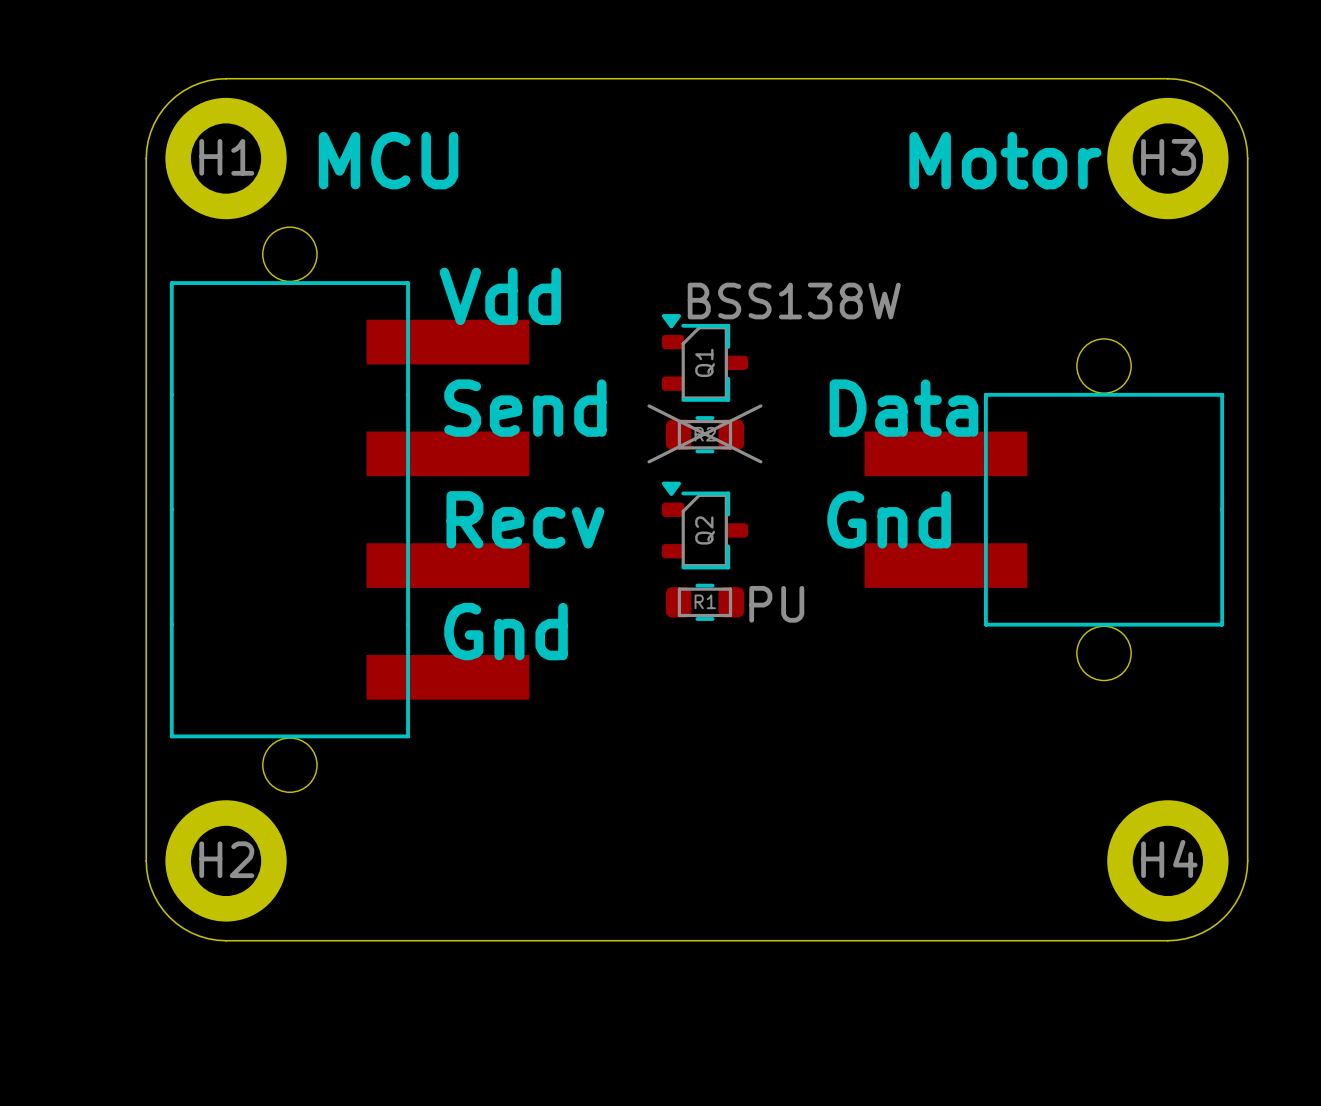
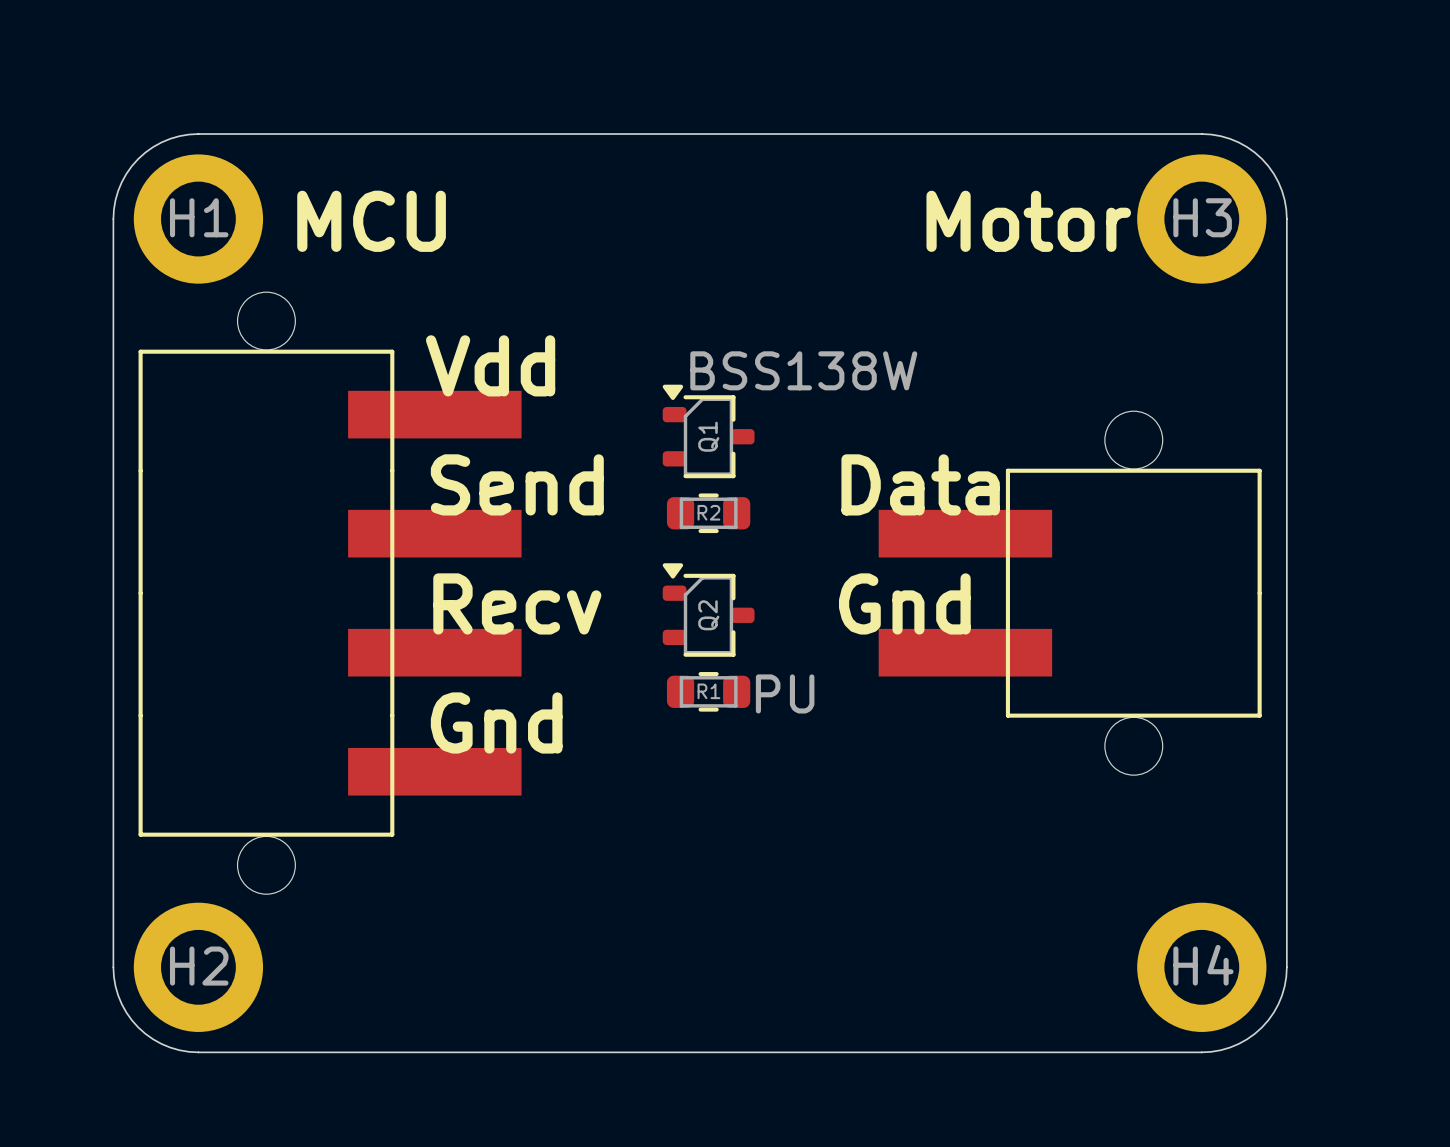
line: (649, 405) (760, 461) -> none
line: (760, 405) (649, 461) -> none

